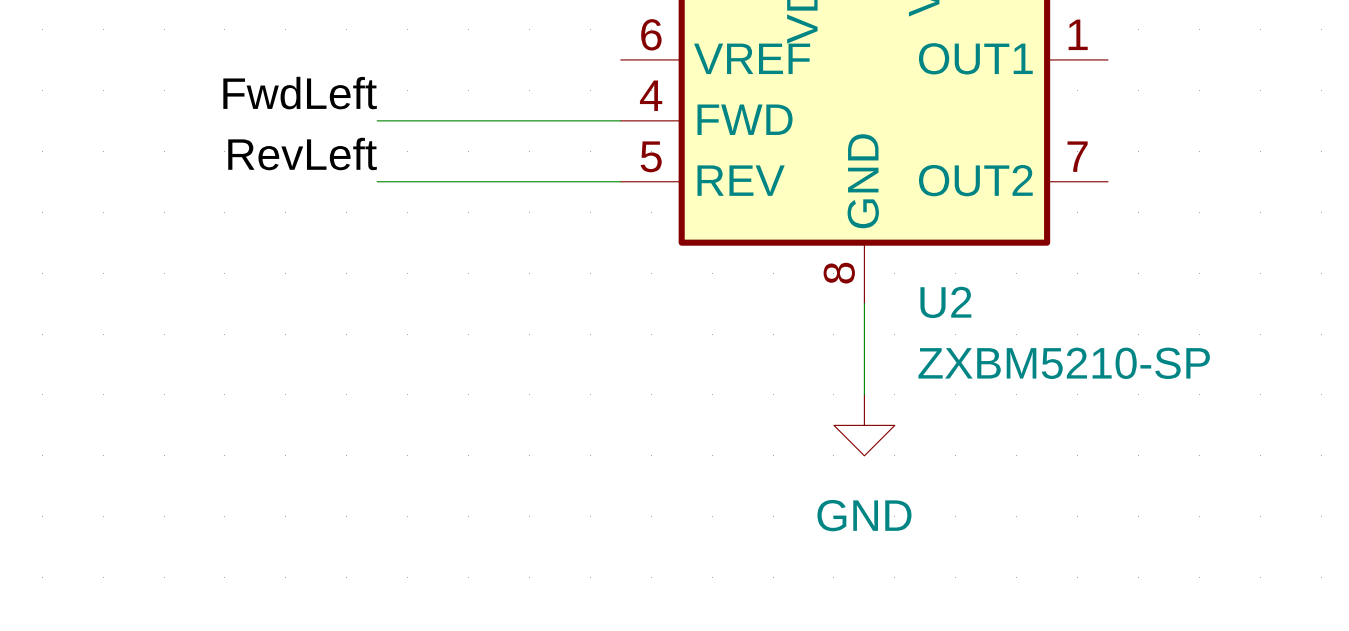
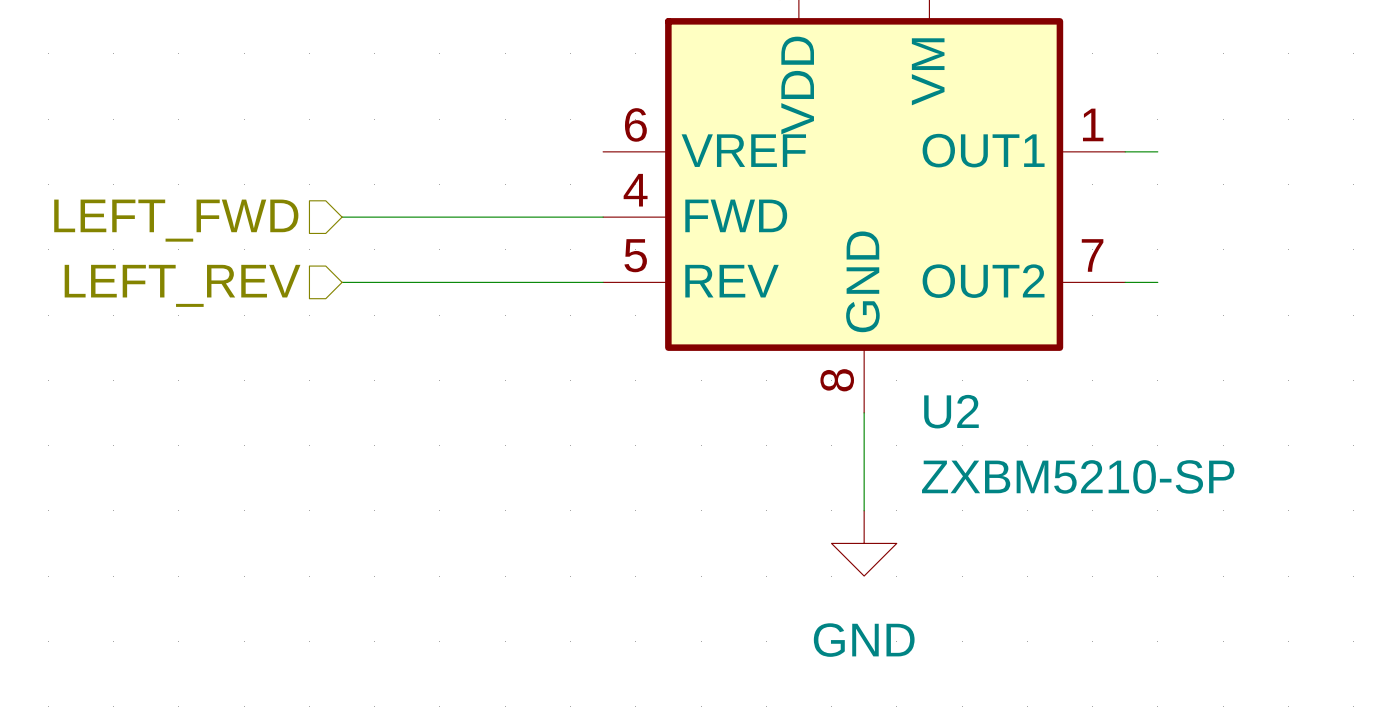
wire: none -> (1125, 151) (1157, 151)
label: FwdLeft (300, 93) -> none
hierarchical label: none -> LEFT_FWD (176, 220)
label: RevLeft (302, 154) -> none
wire: none -> (1125, 282) (1157, 282)
hierarchical label: none -> LEFT_REV (182, 285)

